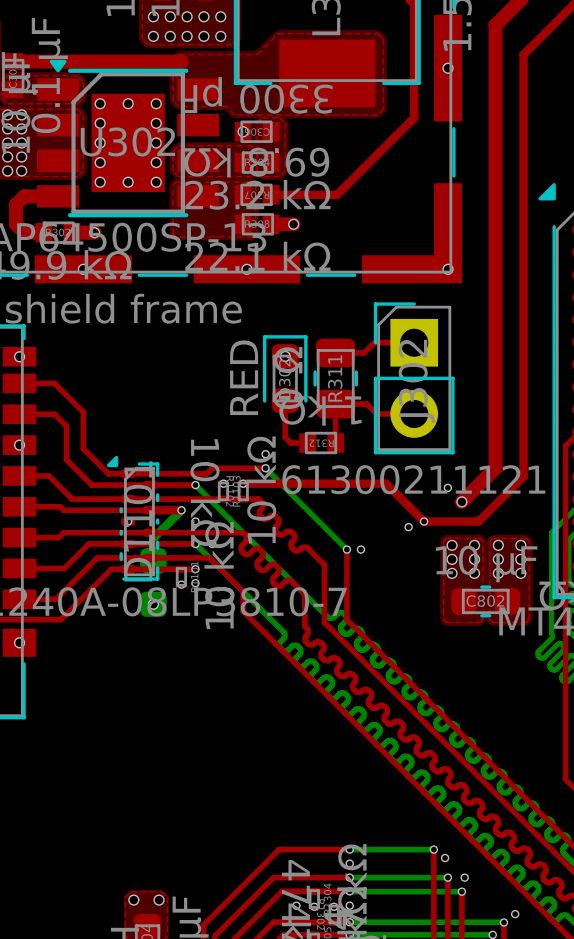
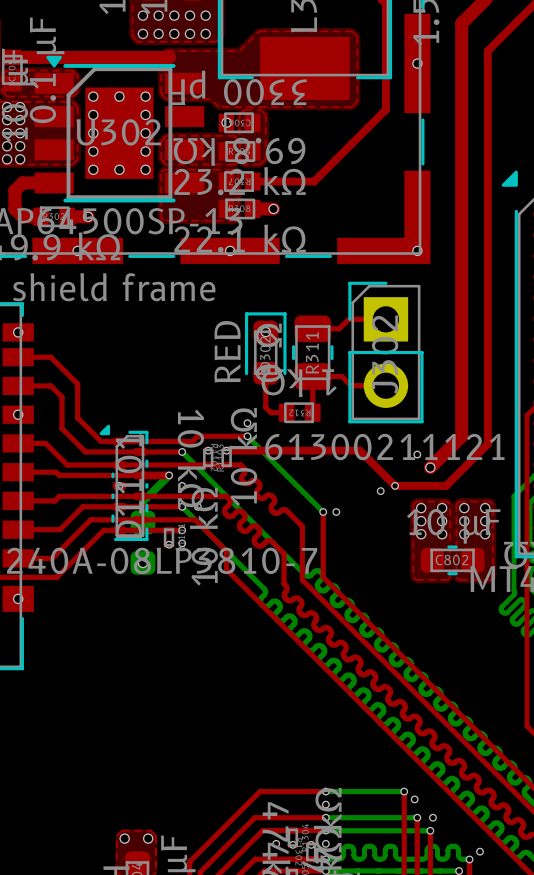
bottom track: (364, 922) (384, 922) -> (339, 859) (342, 857) (343, 848) (347, 846) (353, 847) (354, 856) (358, 859)
bottom track: (386, 922) (406, 922) -> (360, 859) (363, 857) (364, 848) (368, 846) (373, 847) (375, 856) (378, 859)
bottom track: (408, 922) (429, 922) -> (381, 859) (384, 857) (385, 848) (389, 846) (394, 847) (396, 856) (399, 859)
bottom track: (453, 922) (474, 922) -> (422, 859) (426, 856) (427, 848) (431, 846) (436, 847) (437, 856) (441, 859)
bottom track: (476, 922) (496, 922) -> (443, 859) (447, 856) (448, 848) (452, 846) (457, 847) (458, 856) (462, 859)

